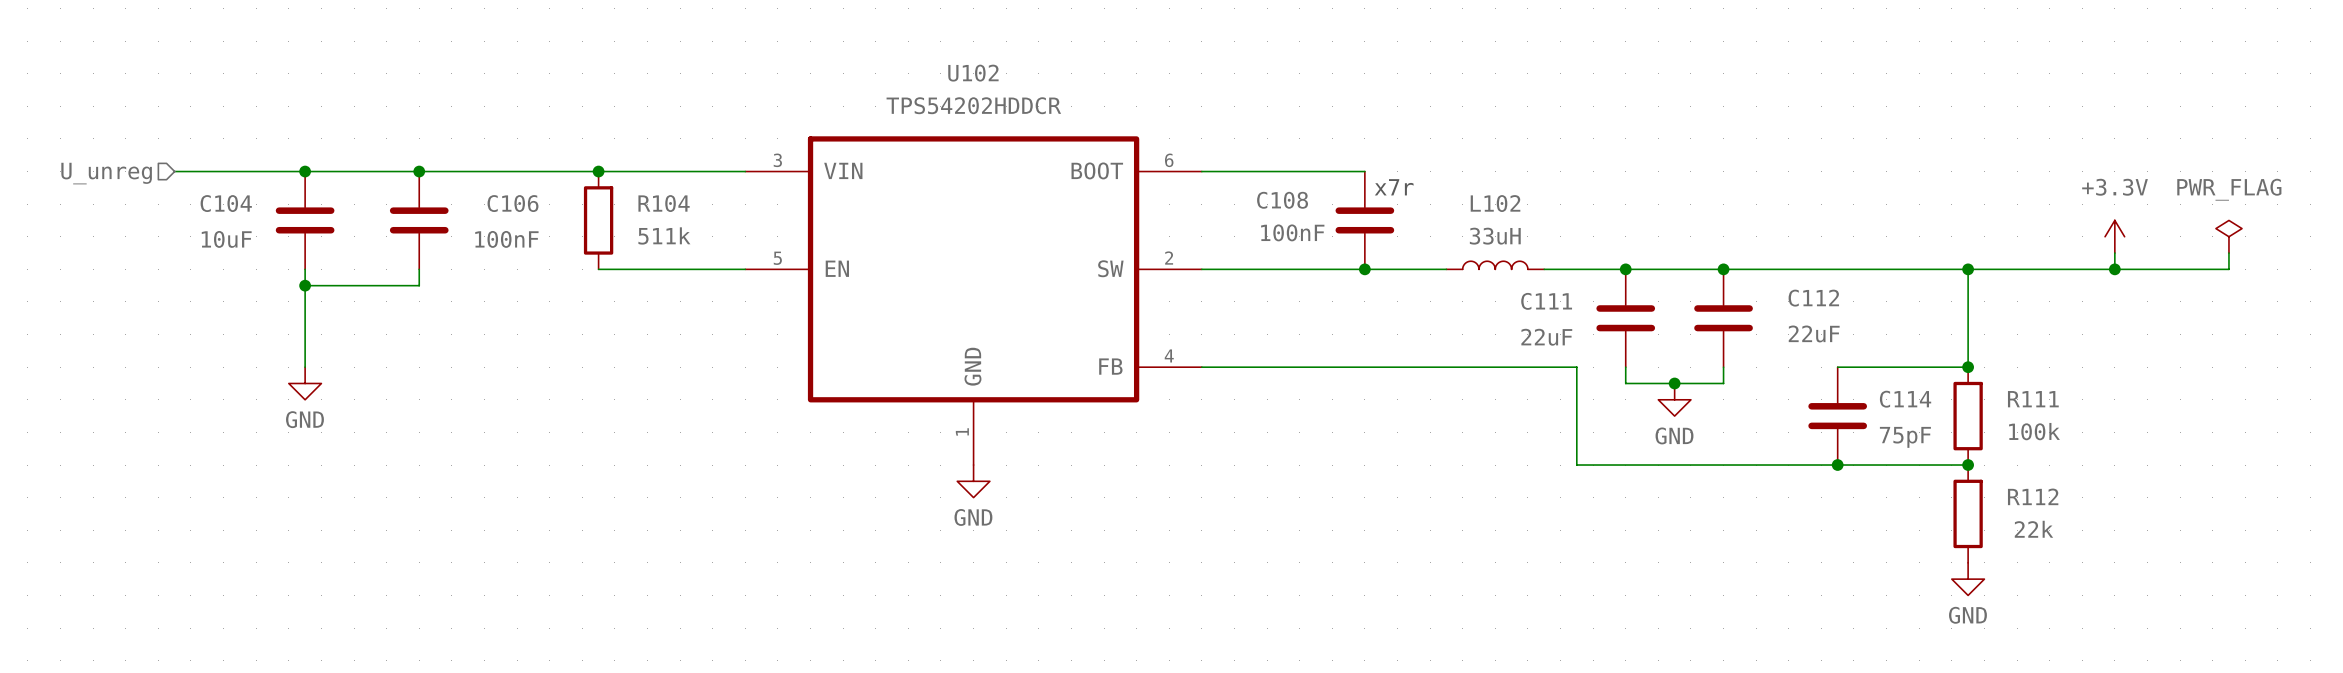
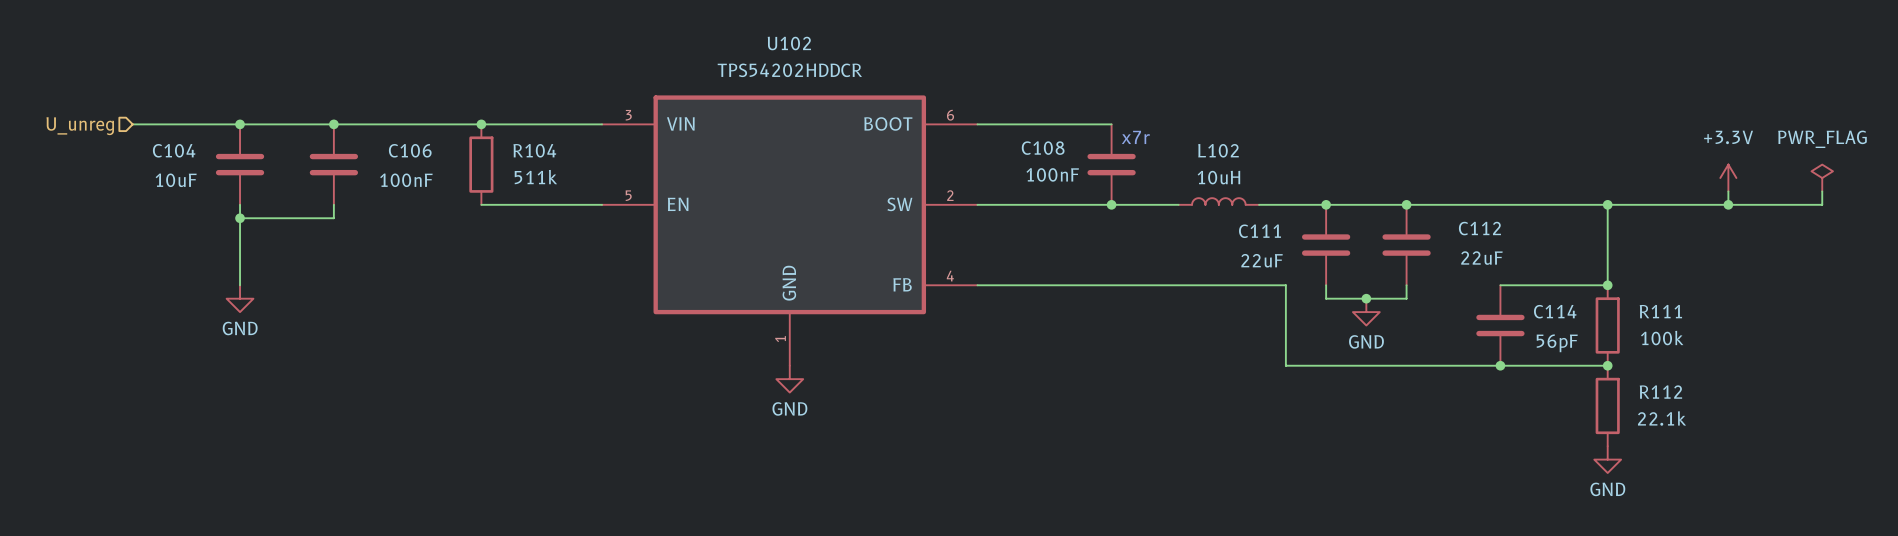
L102 value: 33uH (1495, 236) -> 10uH (1218, 177)
C114 value: 75pF (1905, 437) -> 56pF (1557, 343)
R112 value: 22k (2033, 529) -> 22.1k (1662, 418)

